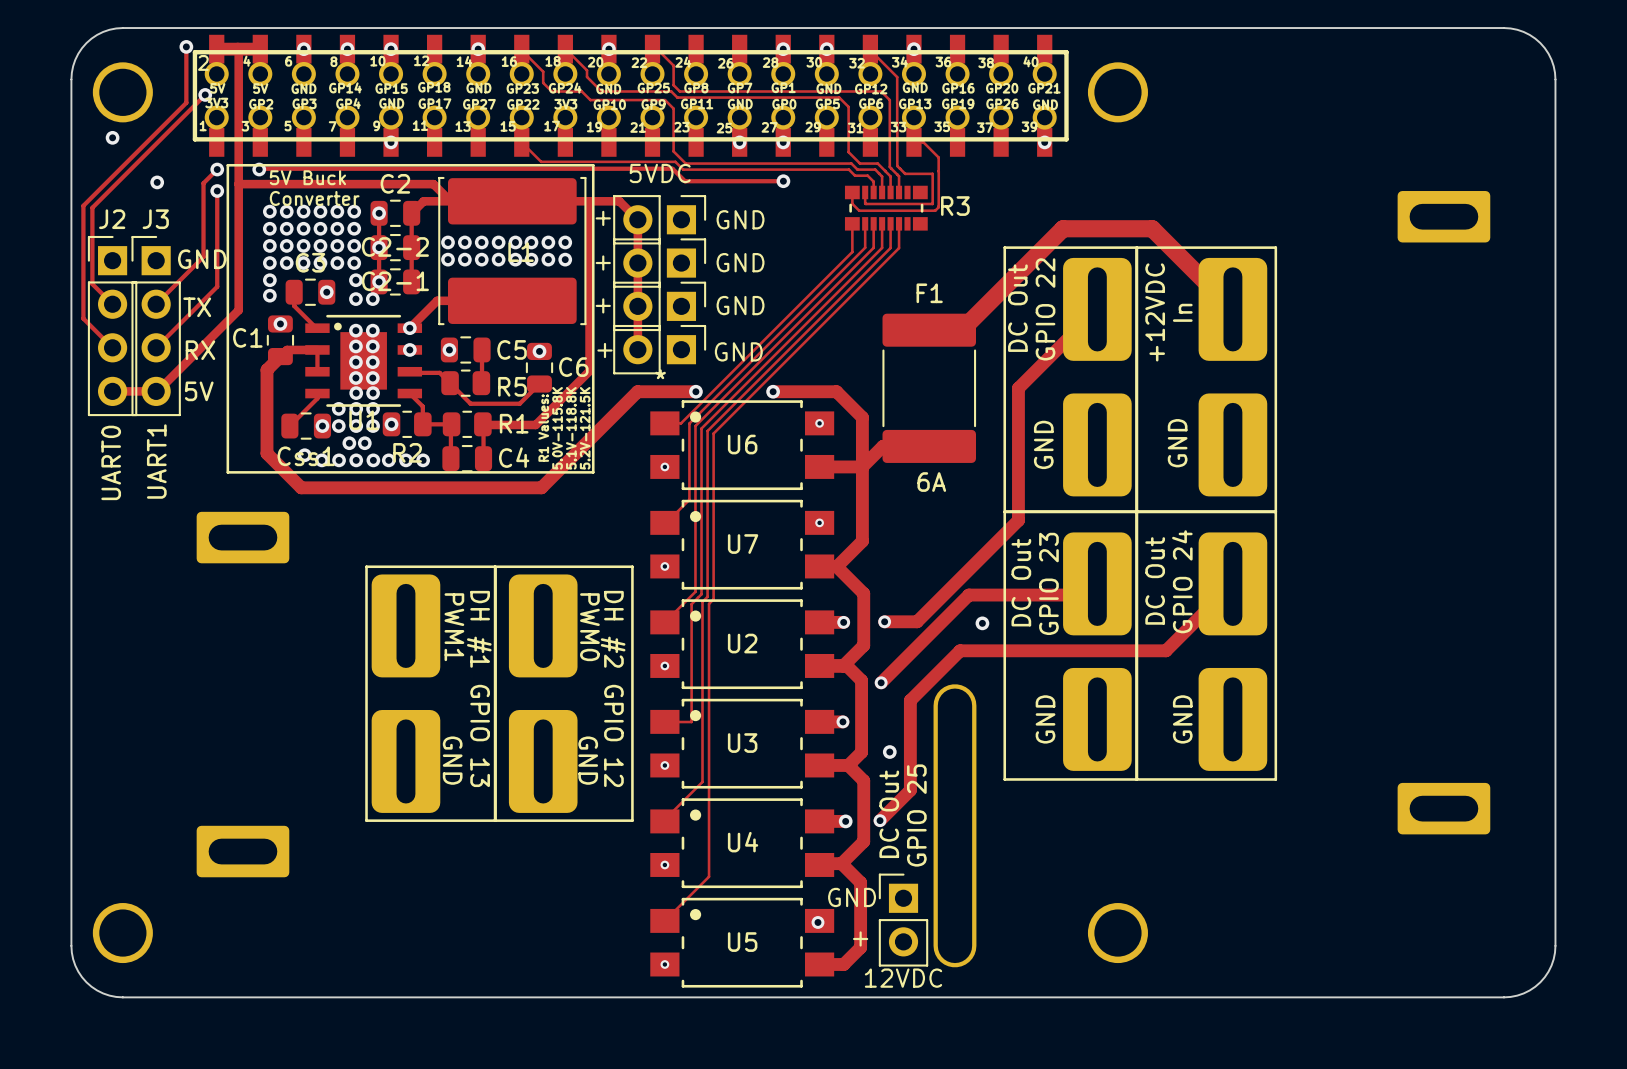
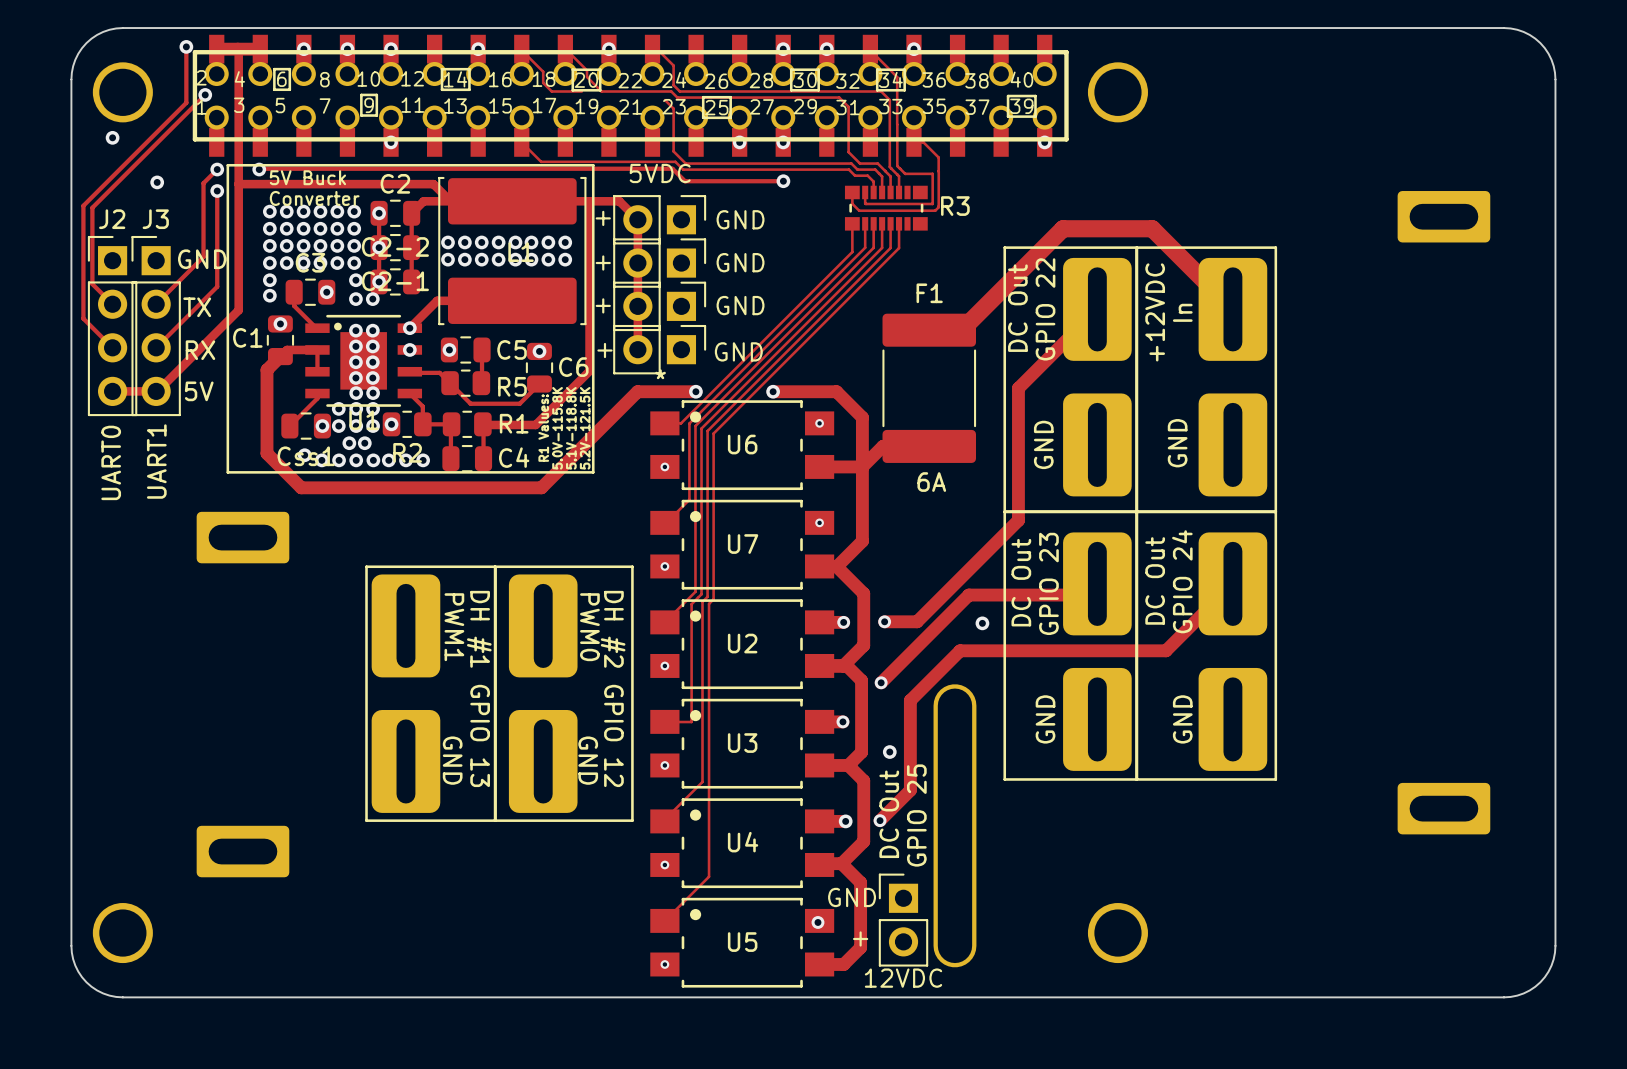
part footprint: [192, 34, 1069, 157] -> [192, 34, 1069, 157]
line: none -> (274, 69) (274, 89) (289, 89) (289, 69) (274, 69)
line: none -> (441, 69) (469, 69) (469, 89) (441, 89) (441, 69)
line: none -> (572, 69) (600, 69) (600, 90) (572, 90) (572, 69)
line: none -> (791, 69) (818, 69) (818, 90) (791, 90) (791, 69)
line: none -> (877, 69) (877, 90) (904, 90) (904, 69) (877, 69)
track: (581, 91) (590, 100) (665, 100) -> none
line: none -> (361, 94) (361, 115) (376, 115) (376, 94) (361, 94)
line: none -> (1008, 96) (1035, 96) (1035, 116) (1008, 116) (1008, 96)
line: none -> (703, 97) (730, 97) (730, 117) (703, 117) (703, 97)

